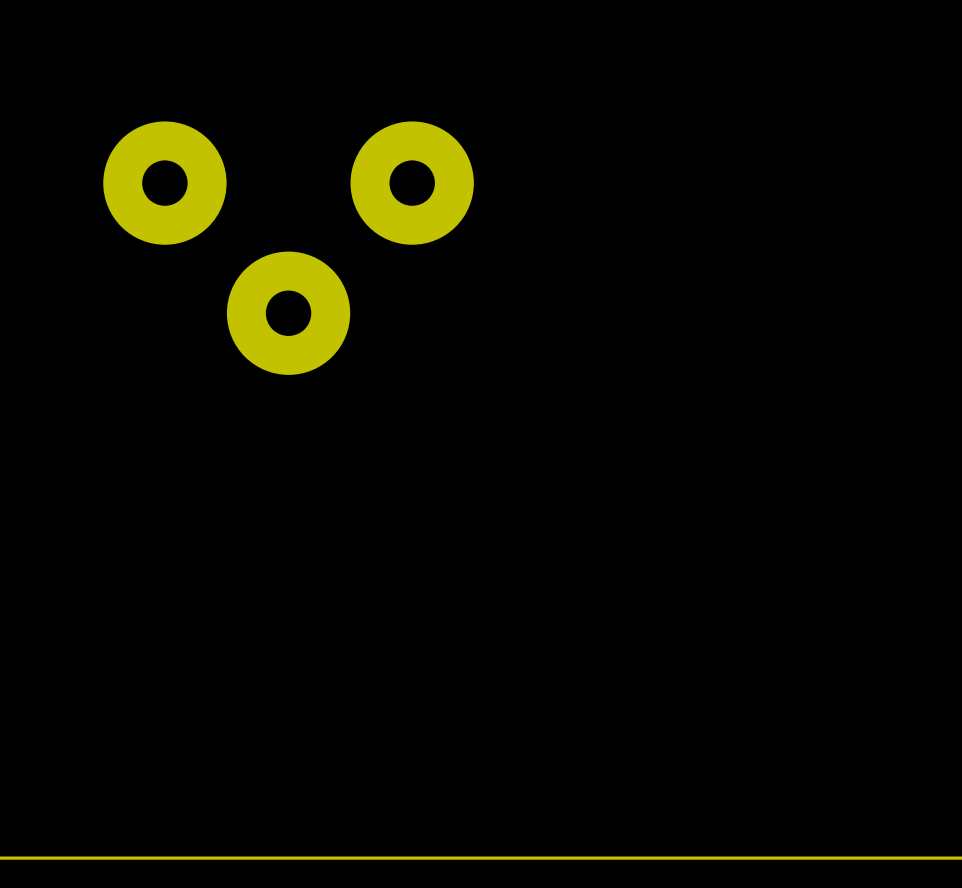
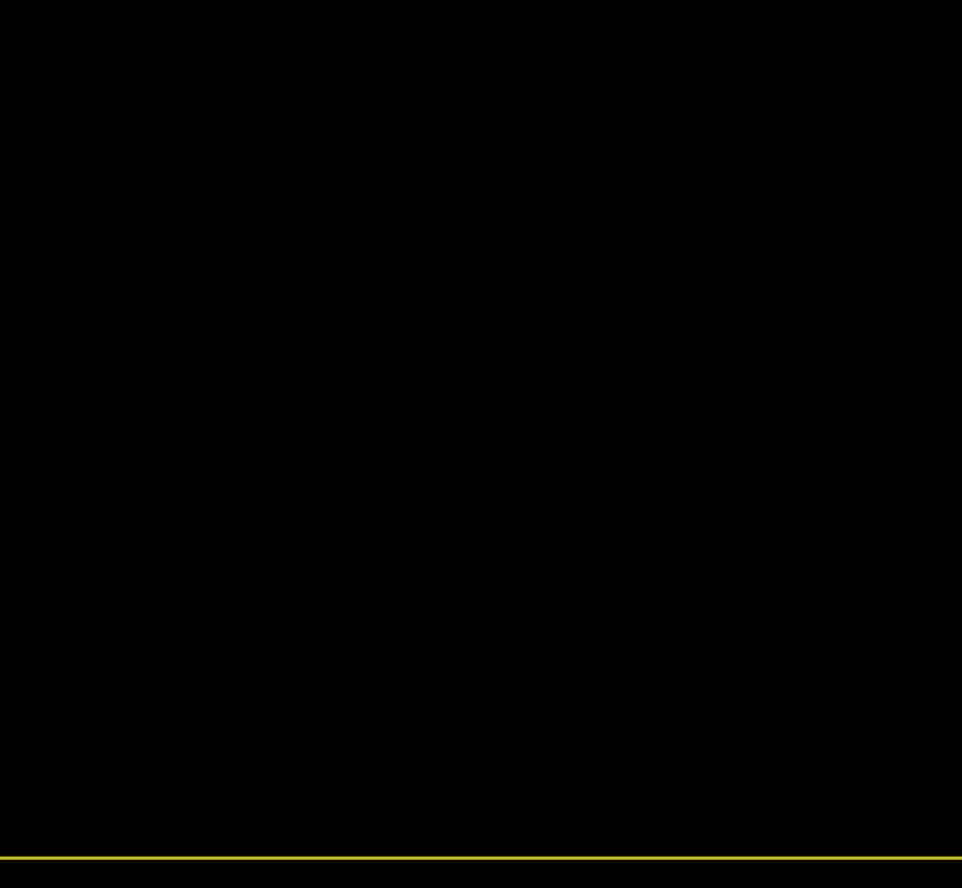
part: (288, 248) -> none

